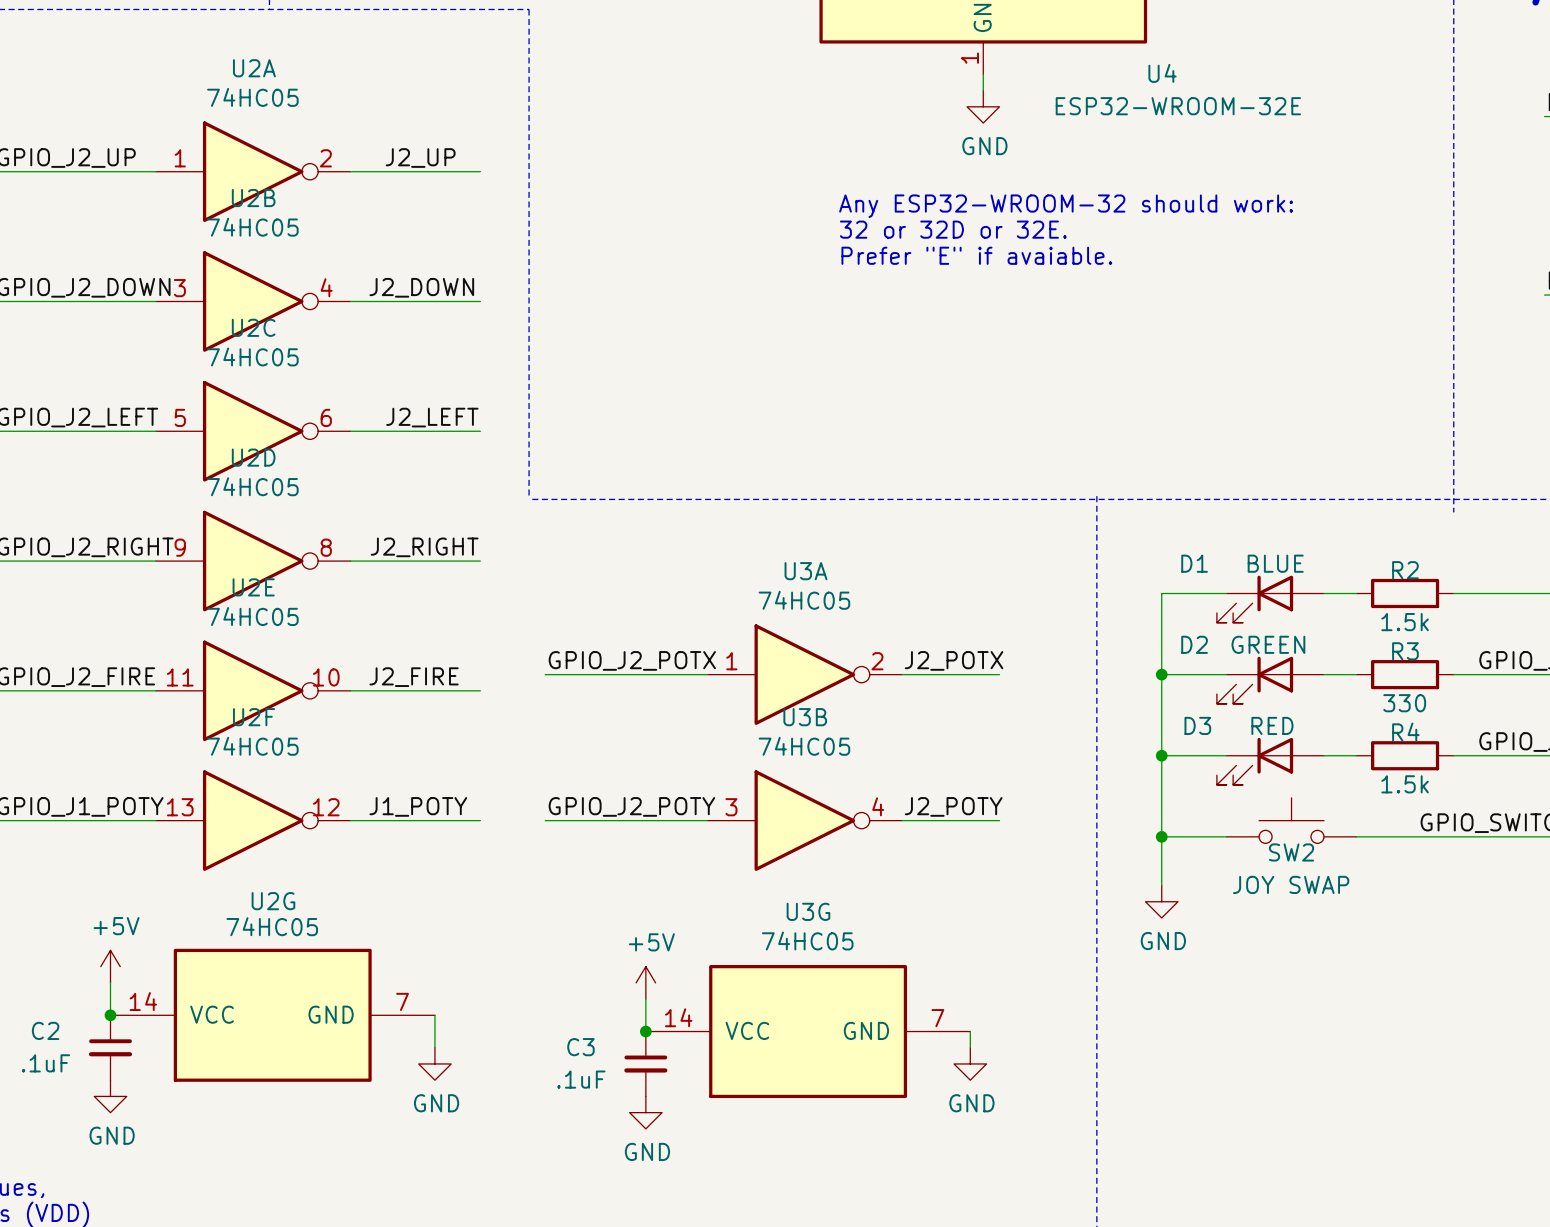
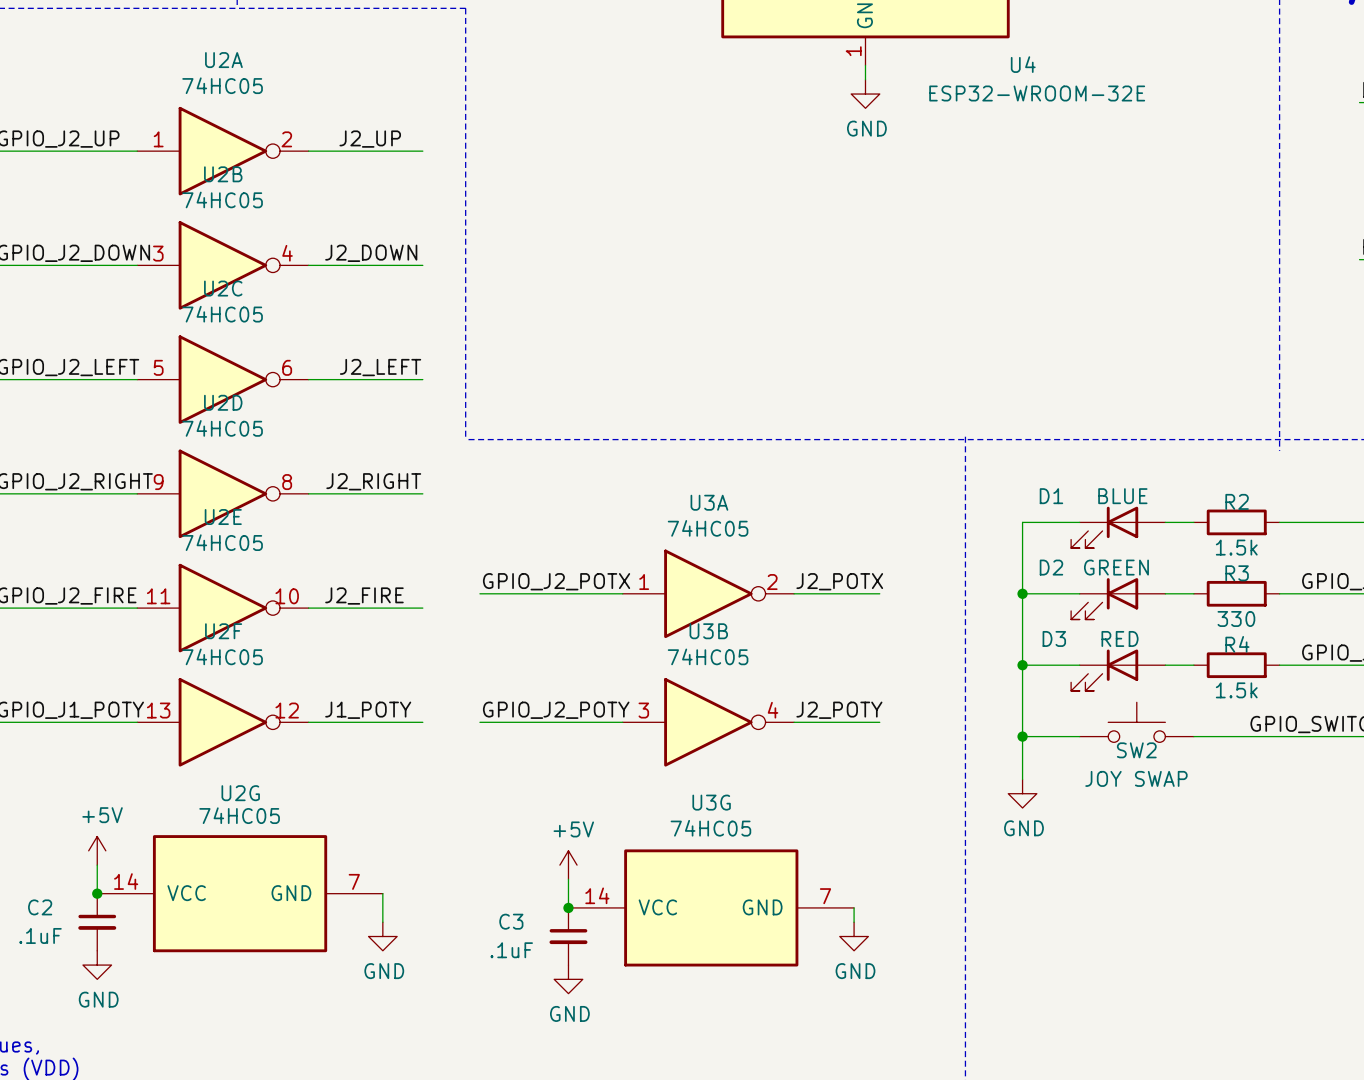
text: Any ESP32-WROOM-32 should work: (1066, 206) -> none
text: 32 or 32D or 32E. (953, 229) -> none
text: Prefer "E" if avaiable. (976, 255) -> none

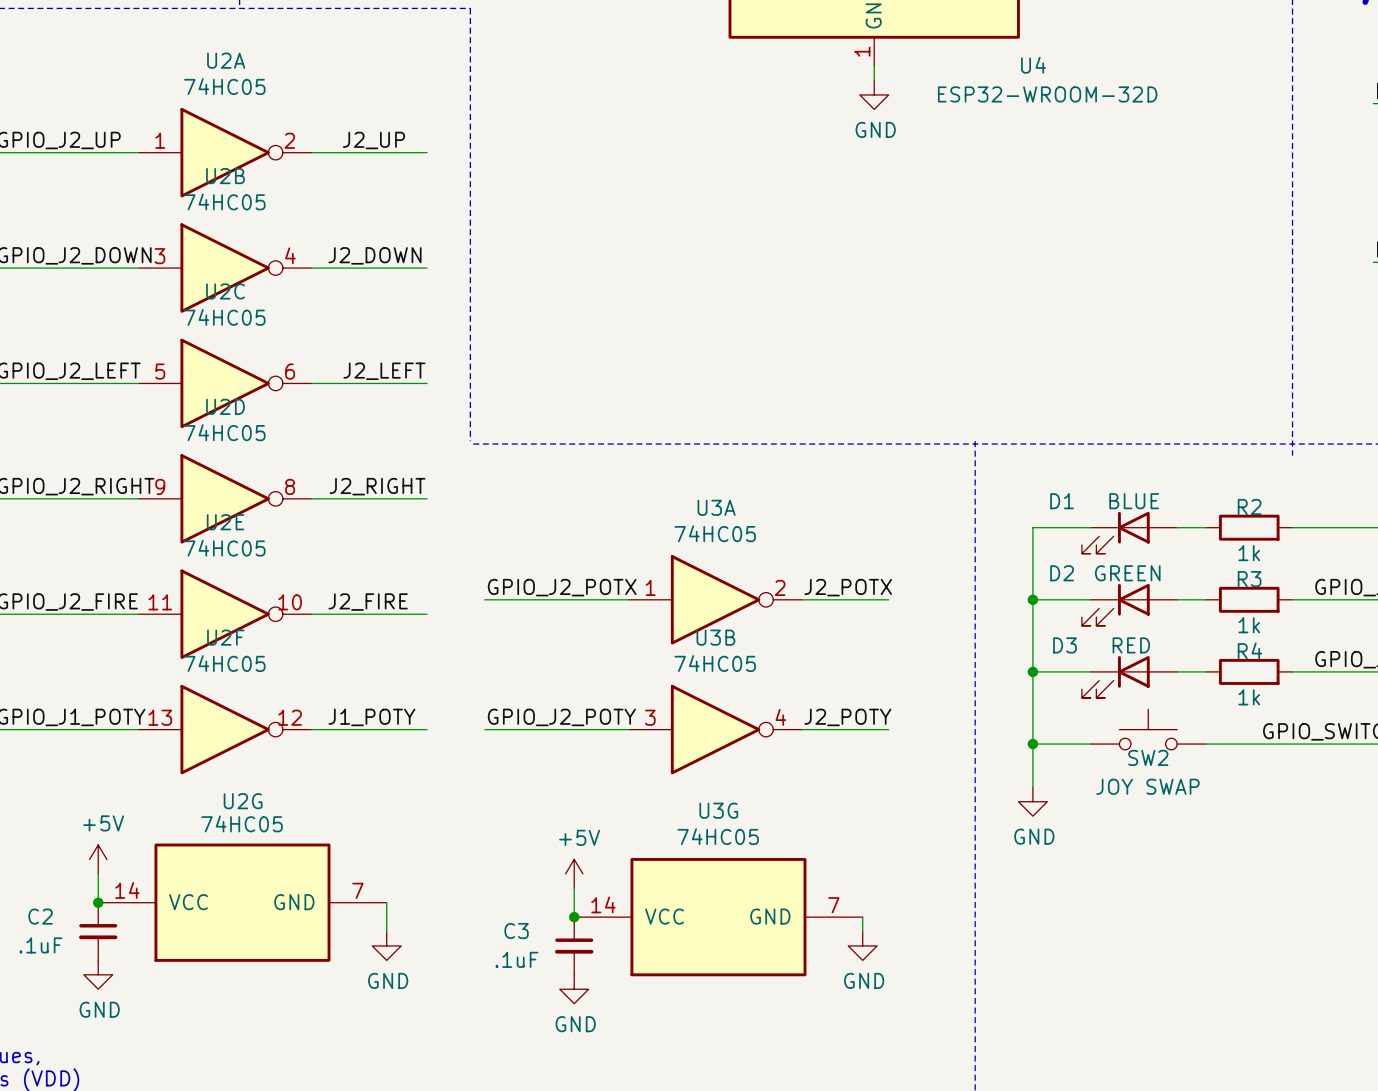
U4 value: ESP32-WROOM-32E (1037, 93) -> ESP32-WROOM-32D (1047, 94)
R2 value: 1.5k (1236, 547) -> 1k (1249, 553)
R3 value: 330 (1236, 618) -> 1k (1249, 625)
R4 value: 1.5k (1236, 690) -> 1k (1249, 697)

